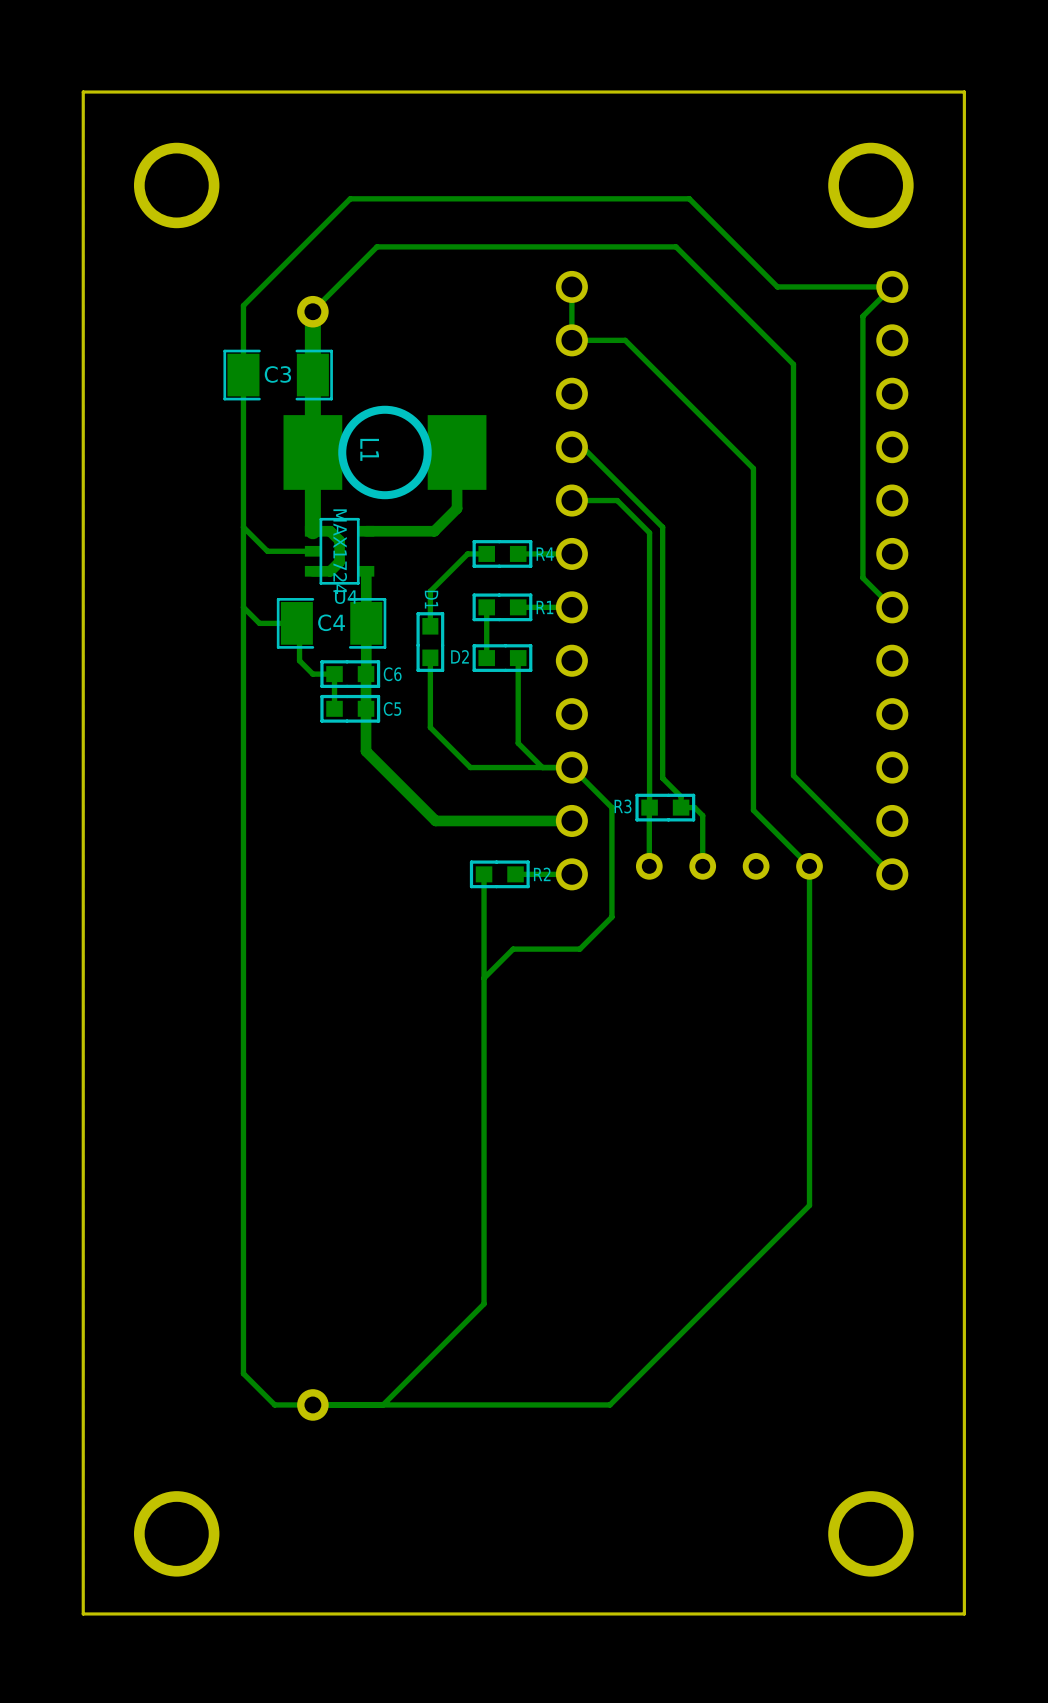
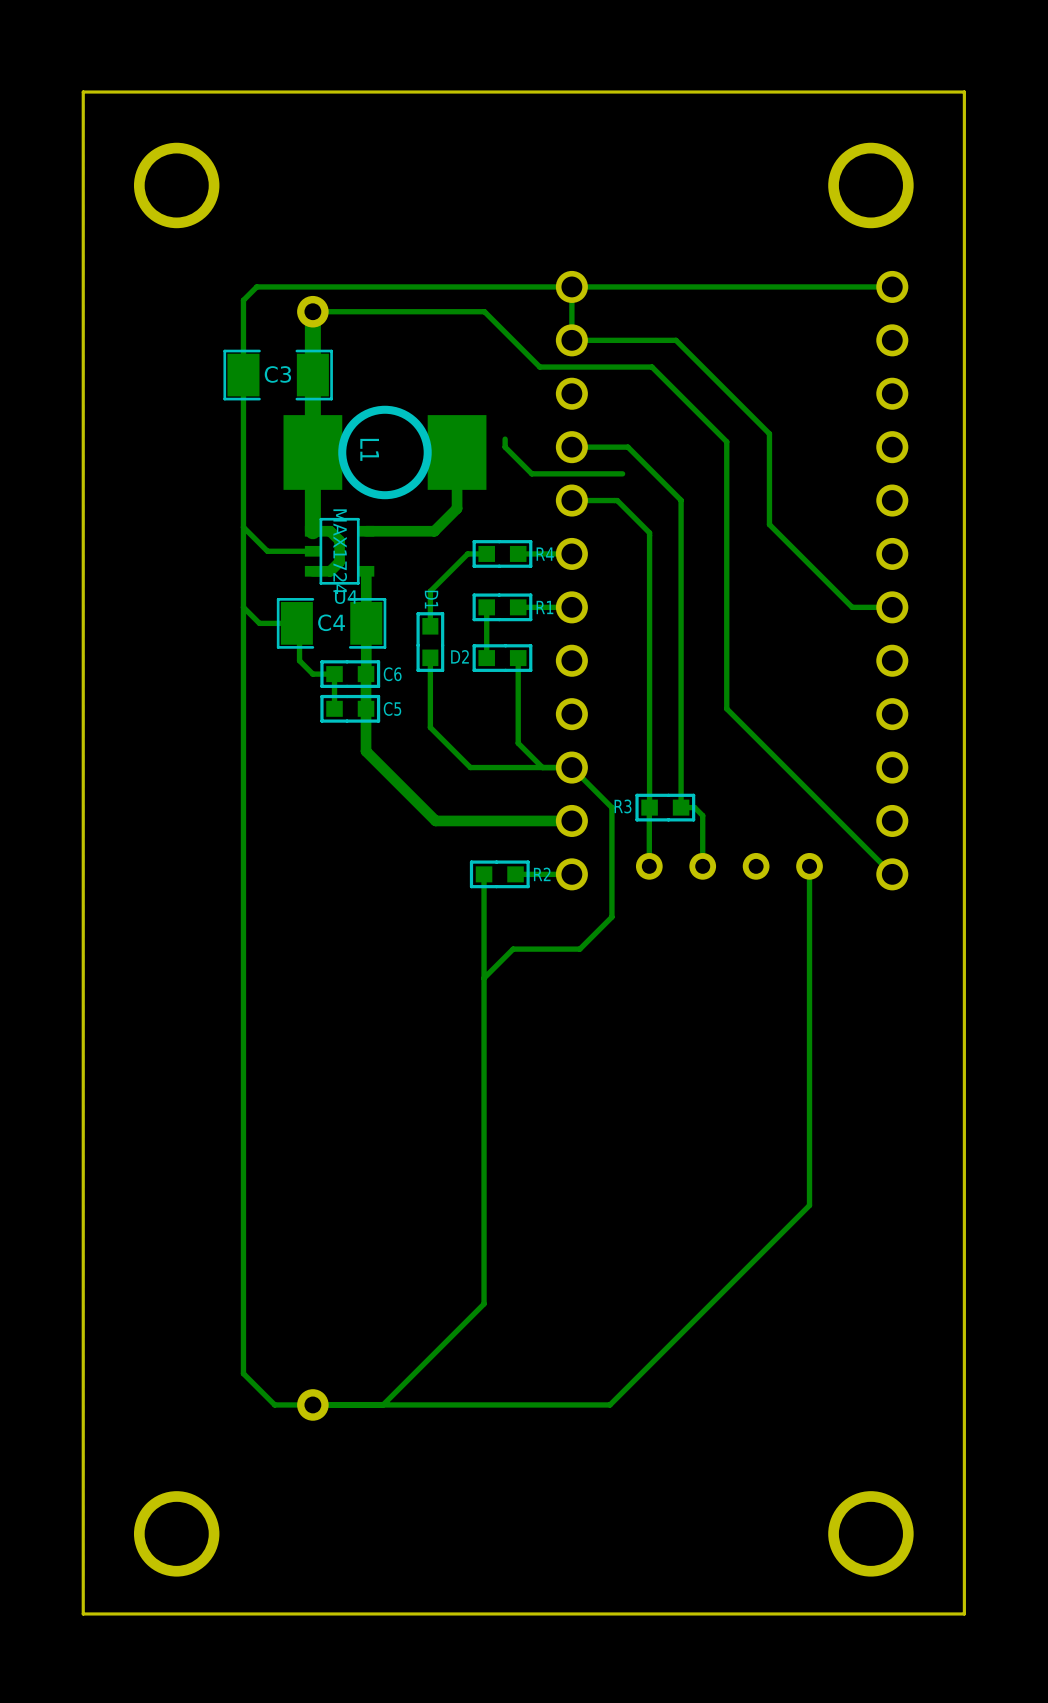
track: (777, 286) (689, 198) (350, 198) (243, 305) -> (777, 286) (256, 286) (243, 300) (243, 305)
track: (892, 286) (862, 316) (862, 577) (892, 607) -> (625, 340) (676, 340) (769, 433) (769, 524) (852, 607) (892, 607)
track: (312, 311) (376, 246) (676, 246) (793, 364) (793, 775) -> none
track: (625, 340) (651, 367) -> (312, 311) (484, 311) (539, 367) (651, 367)
track: none -> (505, 439) (505, 447) (531, 473) (622, 473)
track: (726, 441) (753, 468) (753, 810) (809, 866) -> (726, 441) (726, 708) (793, 775)
track: (582, 447) (662, 527) (662, 778) (681, 796) -> (582, 447) (627, 447) (681, 500) (681, 796)

